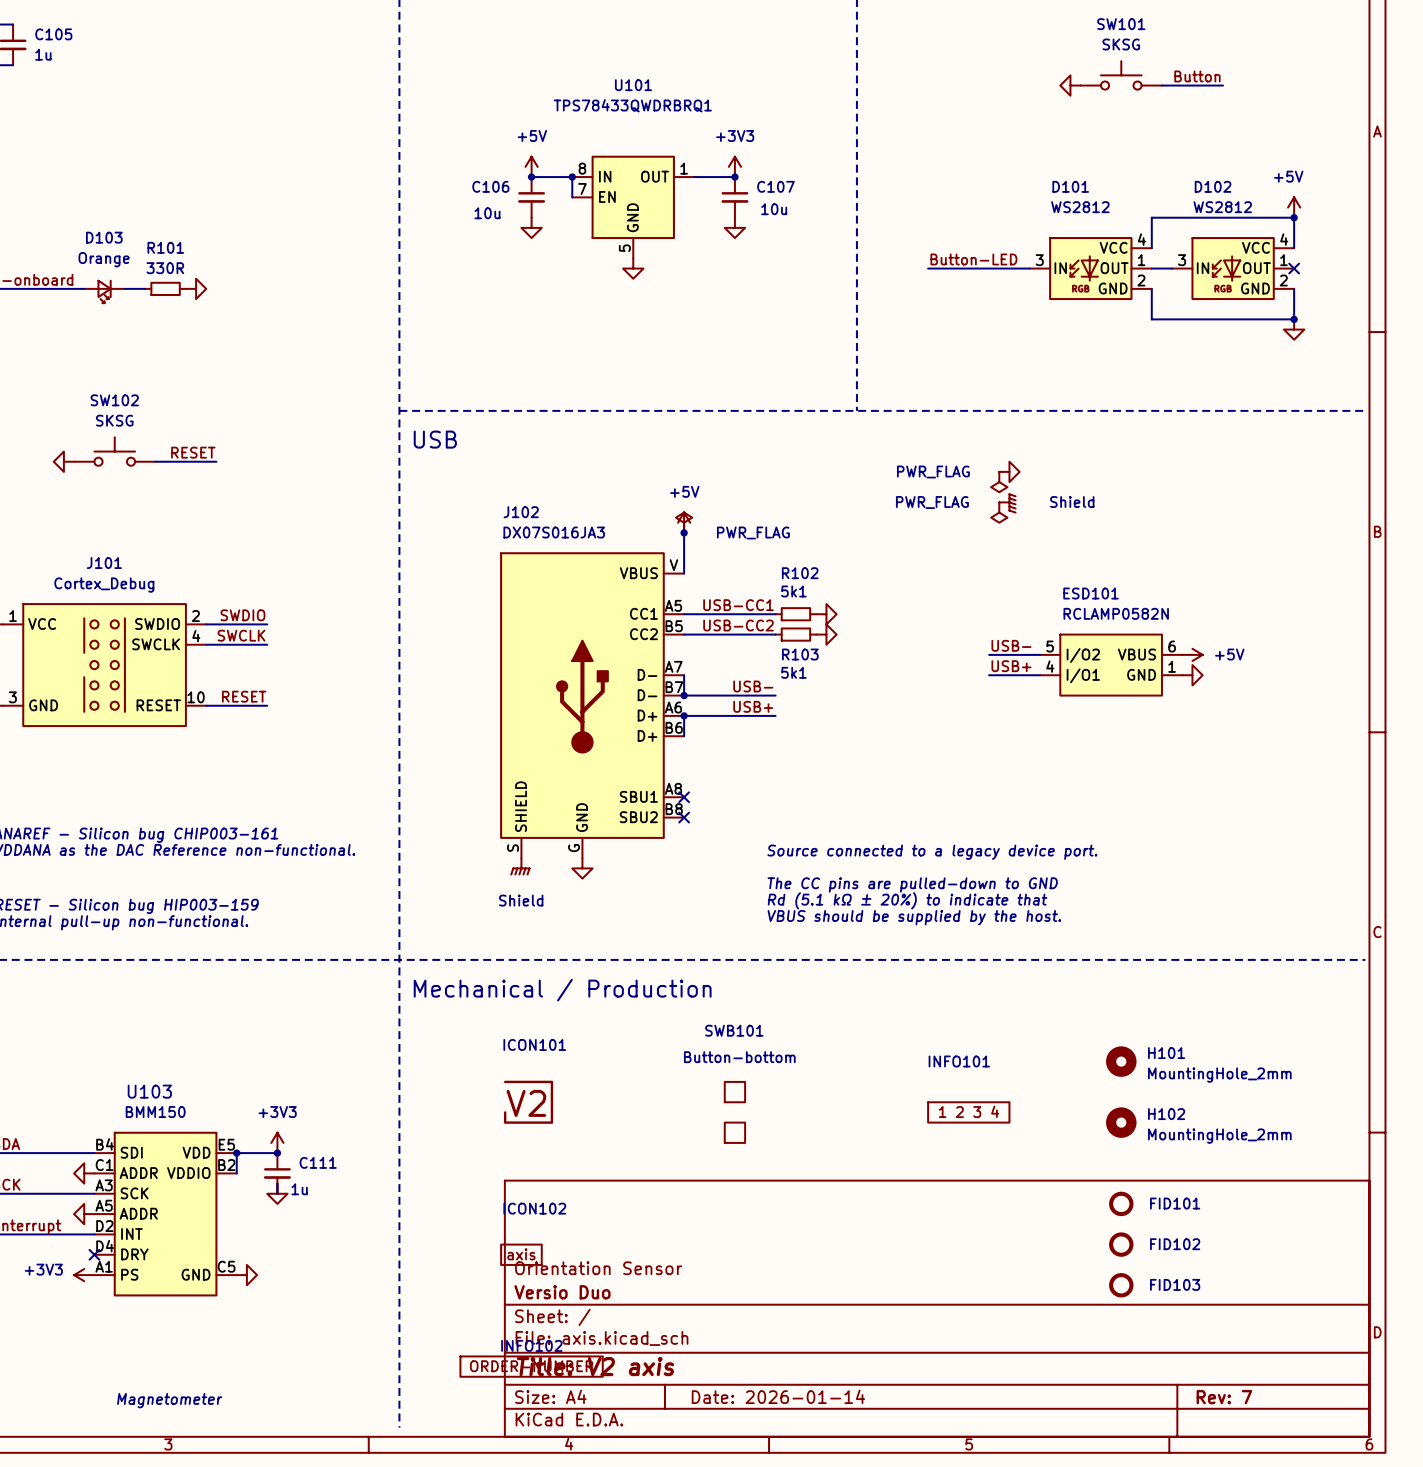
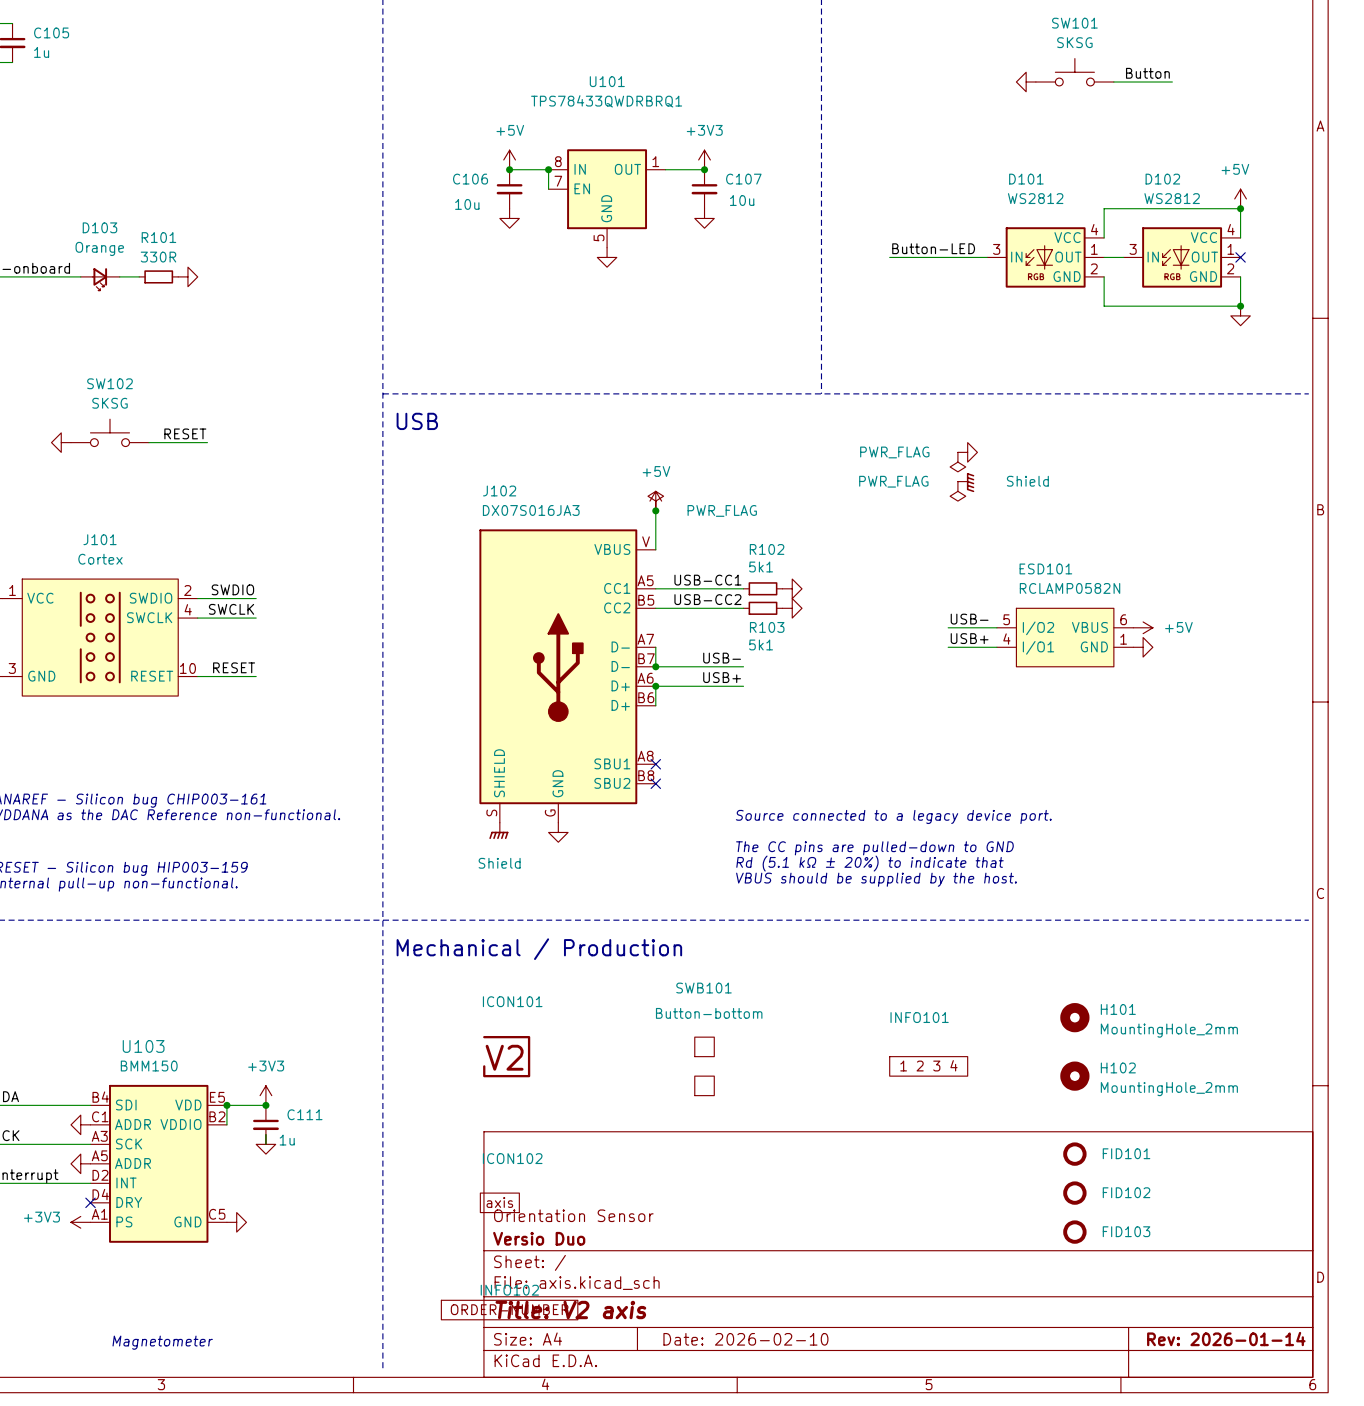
J101 value: Cortex_Debug (104, 585) -> Cortex (100, 559)
title block: Date: 2026-01-14 (778, 1396) -> Date: 2026-02-10 (745, 1339)
title block: Rev: 7 (1224, 1397) -> Rev: 2026-01-14 (1226, 1339)

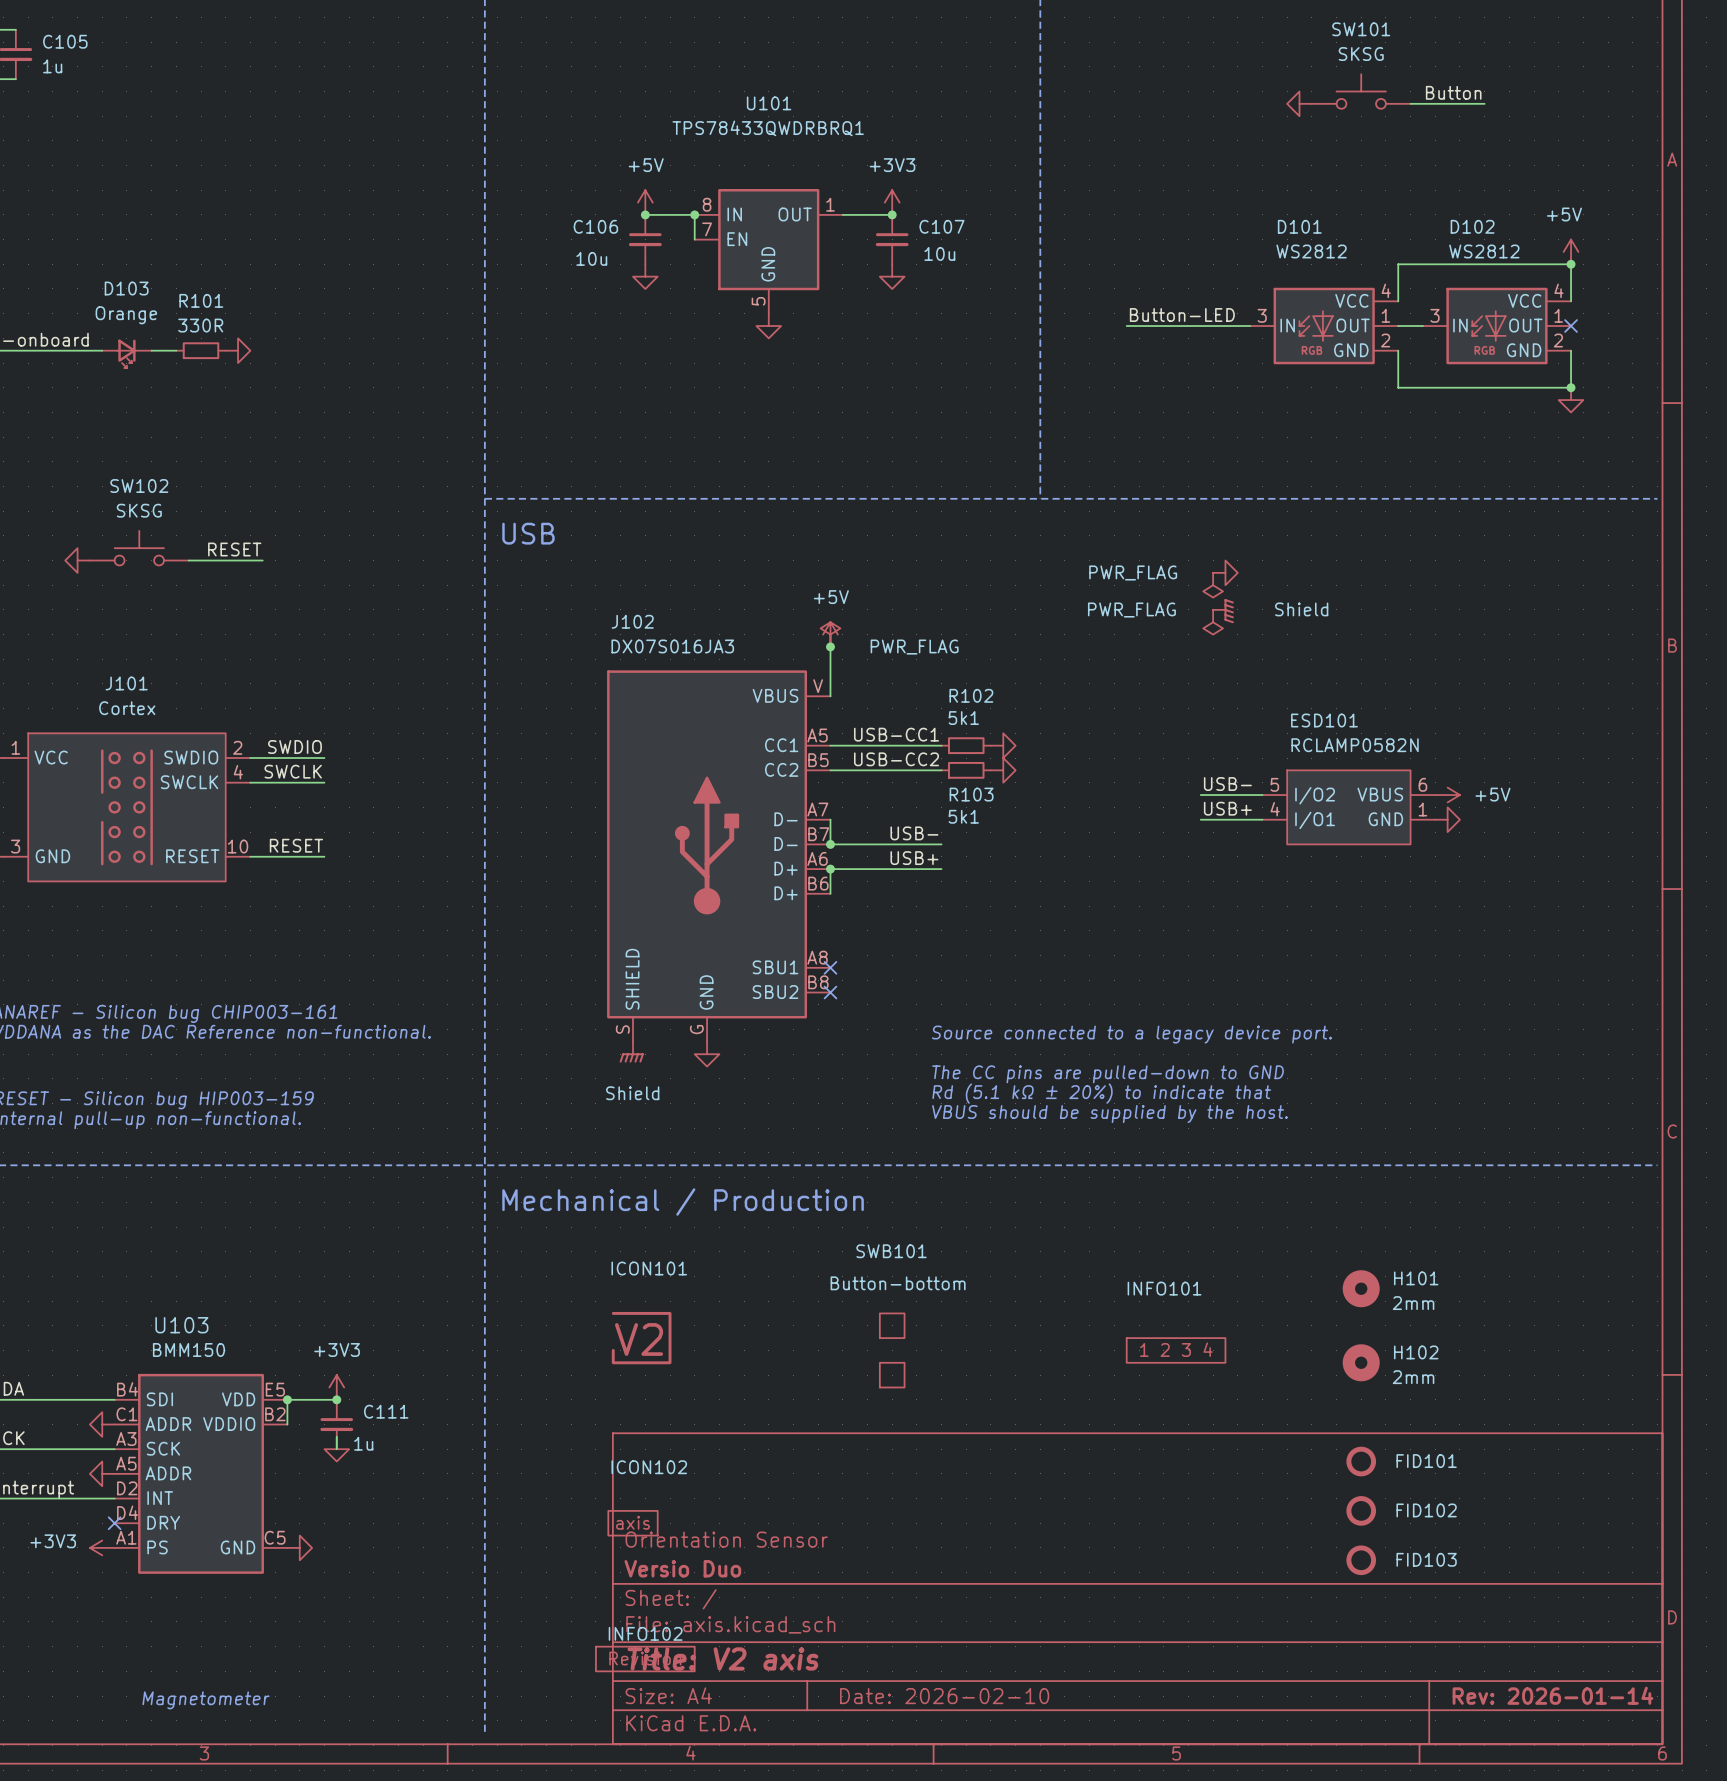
H101 value: MountingHole_2mm (1169, 1030) -> 2mm (1413, 1303)
H102 value: MountingHole_2mm (1169, 1089) -> 2mm (1413, 1377)
INFO102 symbol: [441, 1300, 578, 1320] -> [595, 1646, 695, 1672]

